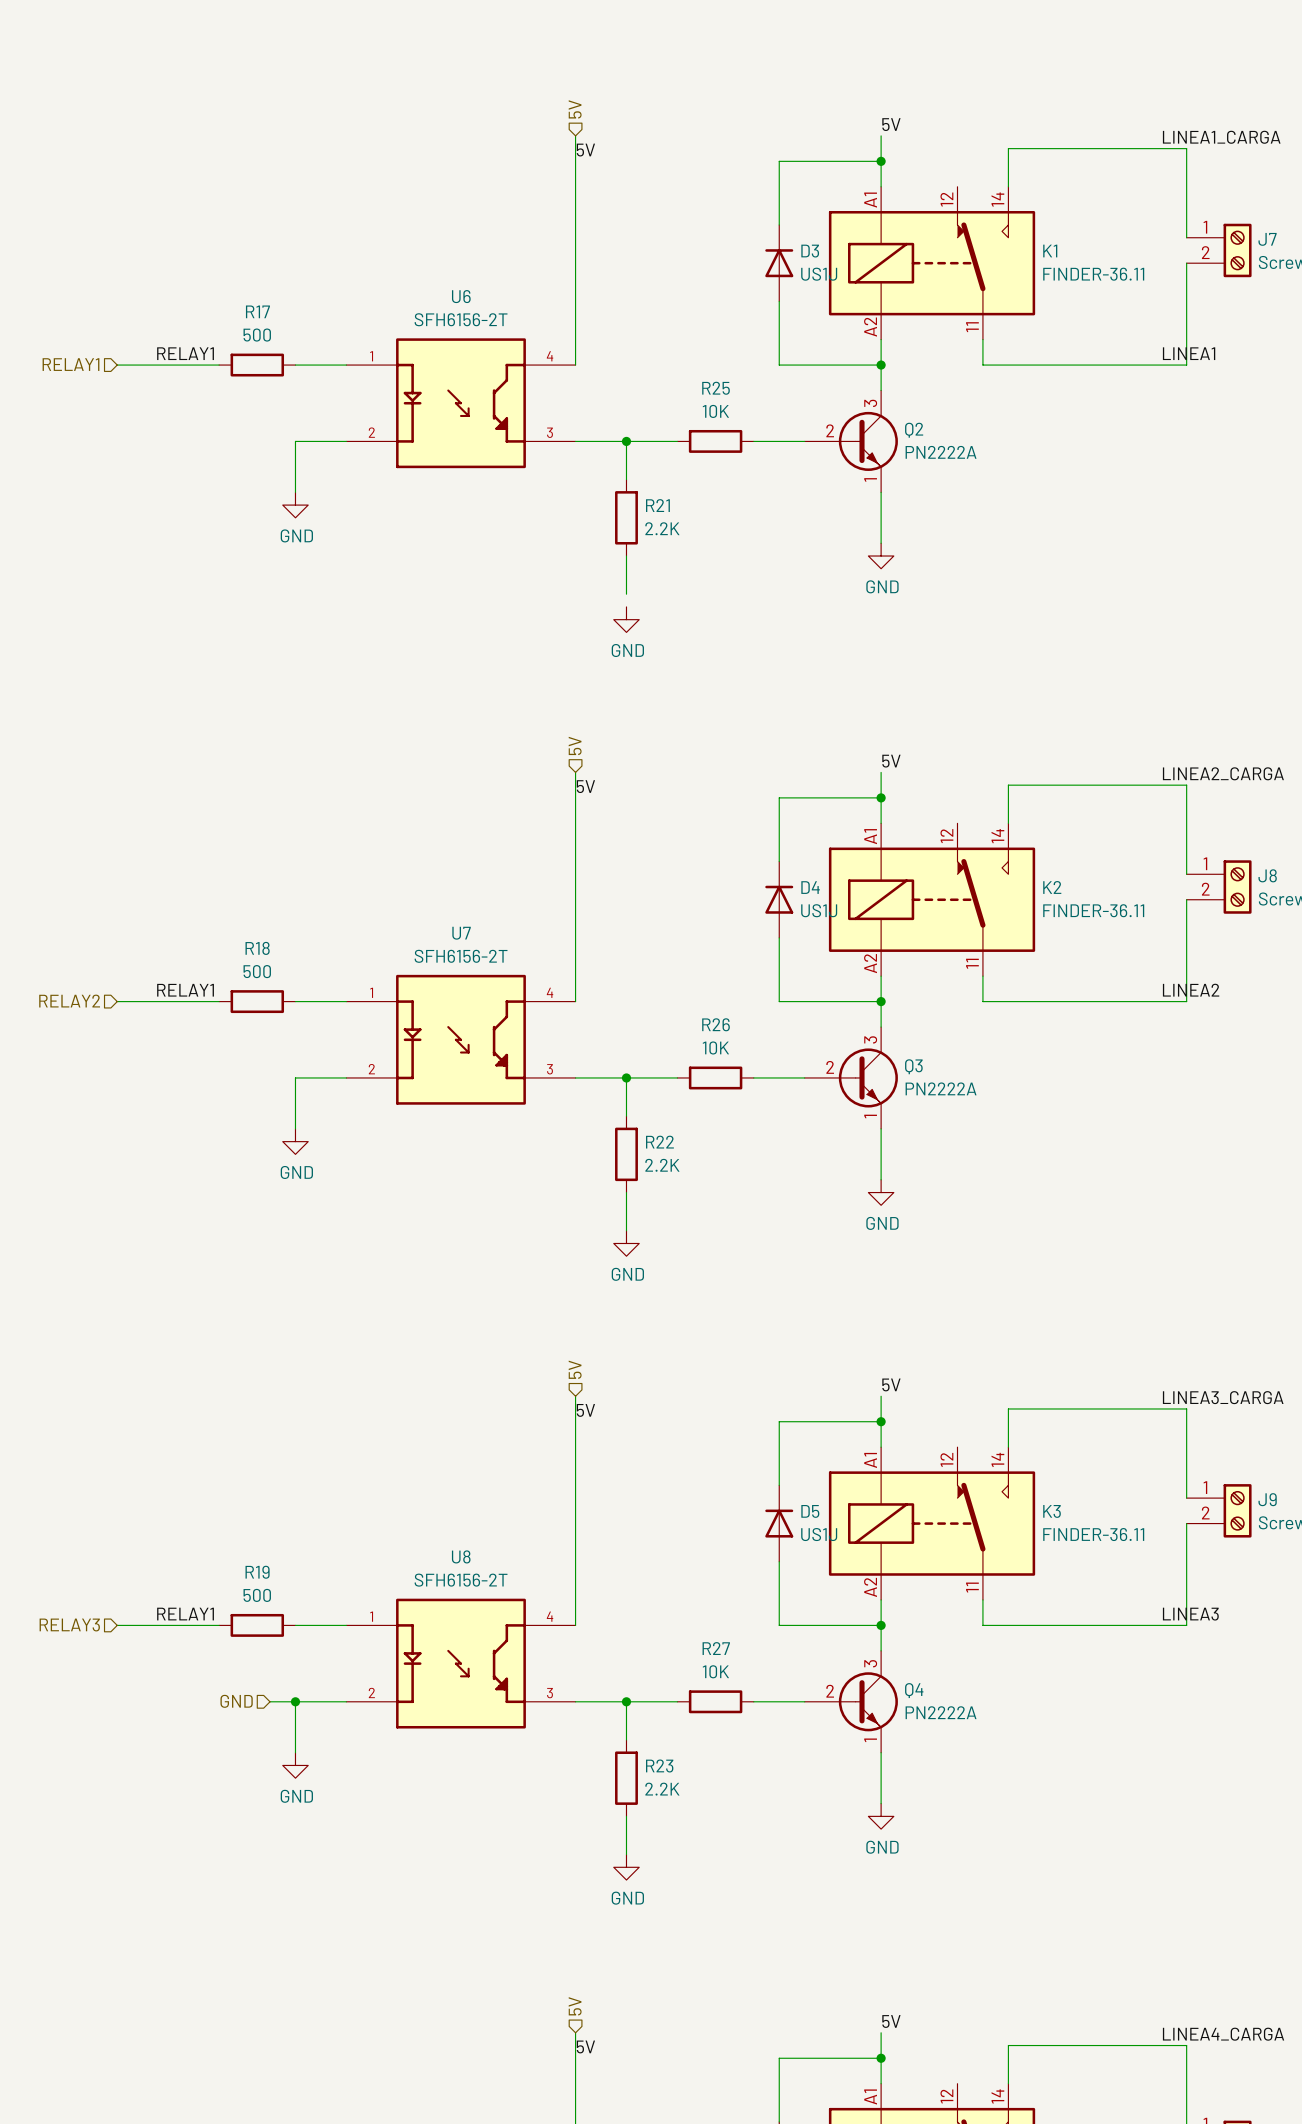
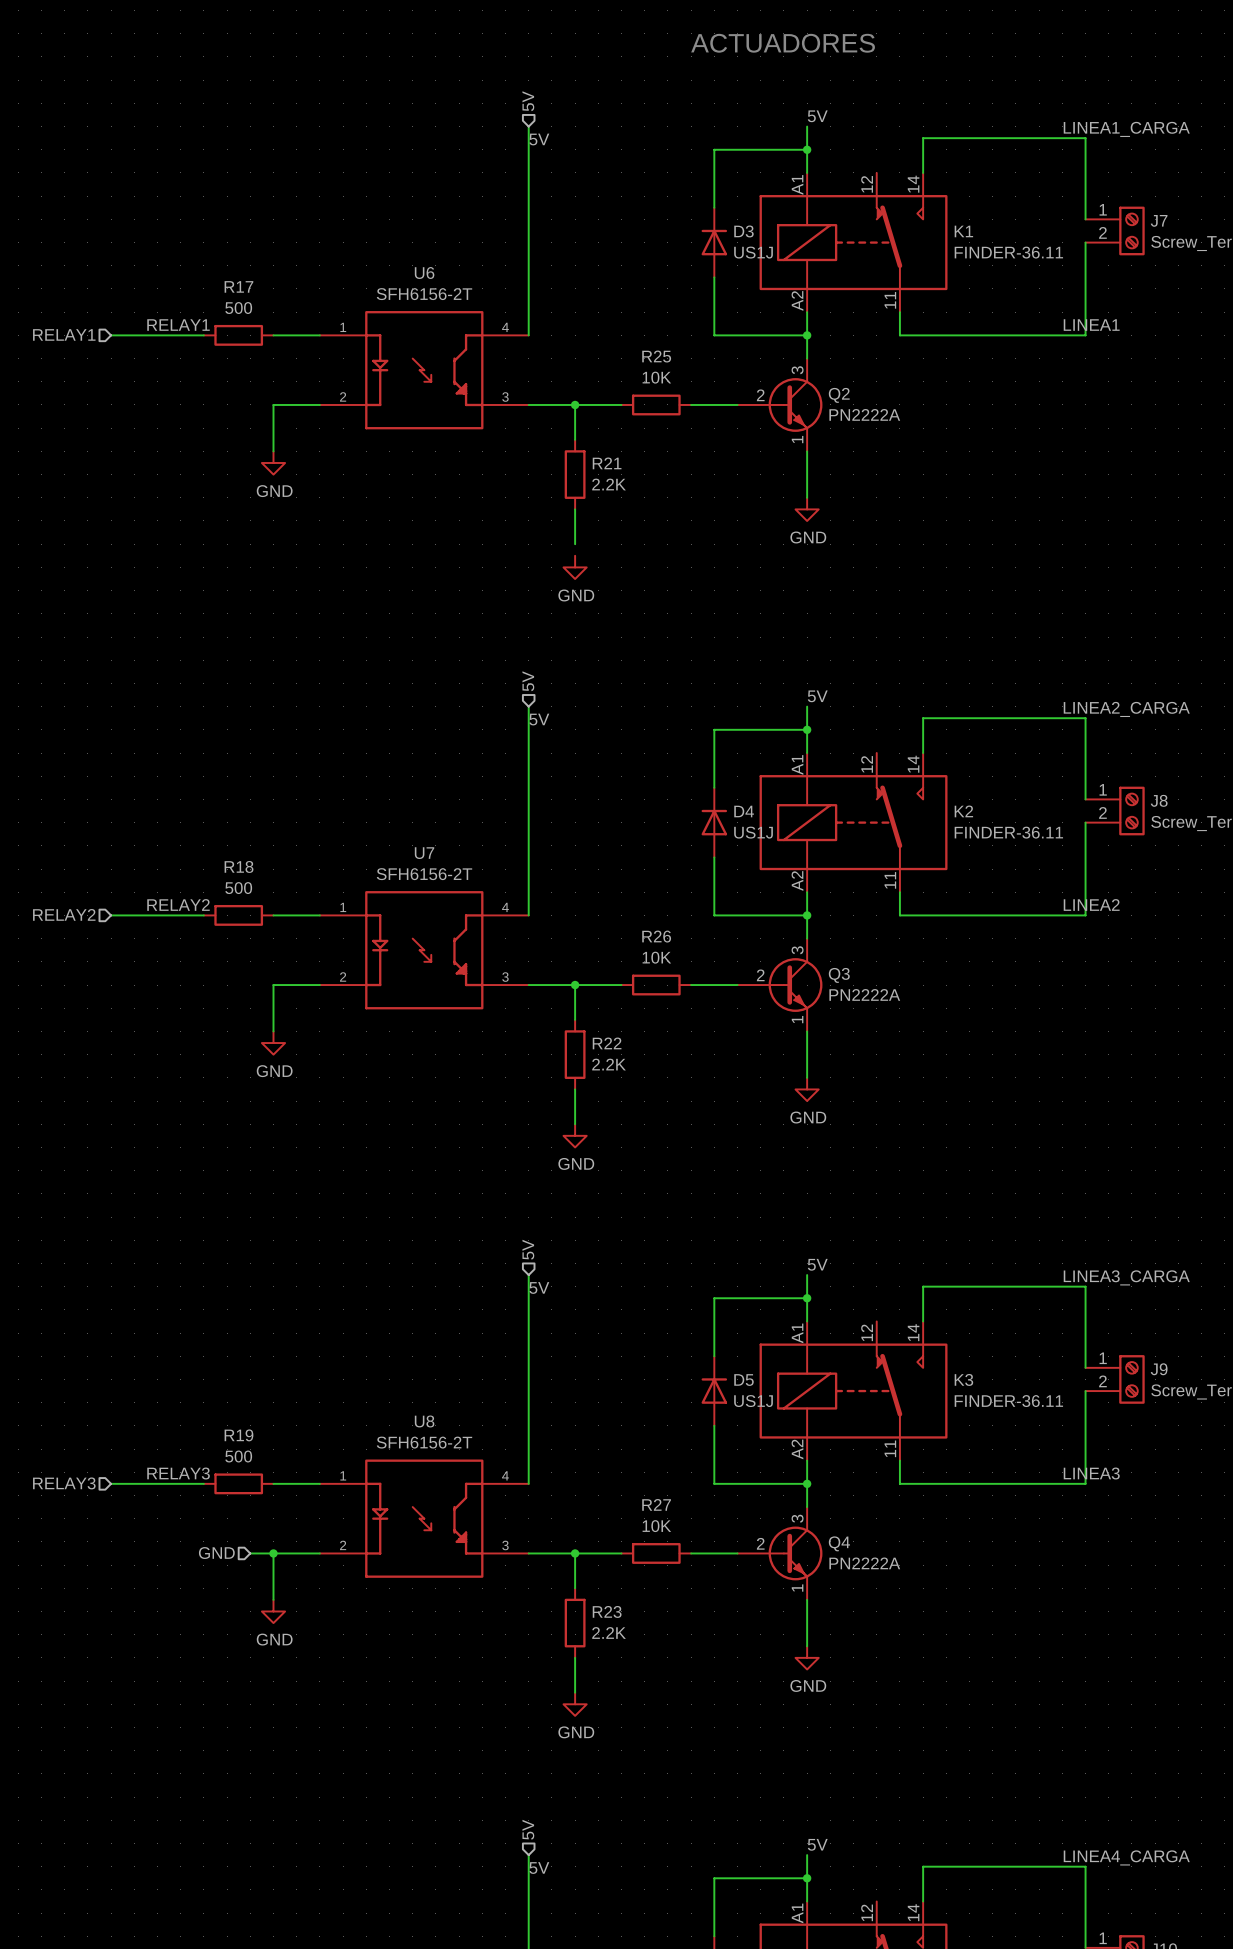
text: none -> ACTUADORES (783, 43)
label: RELAY1 (185, 990) -> RELAY2 (178, 904)
label: RELAY1 (185, 1614) -> RELAY3 (178, 1473)

